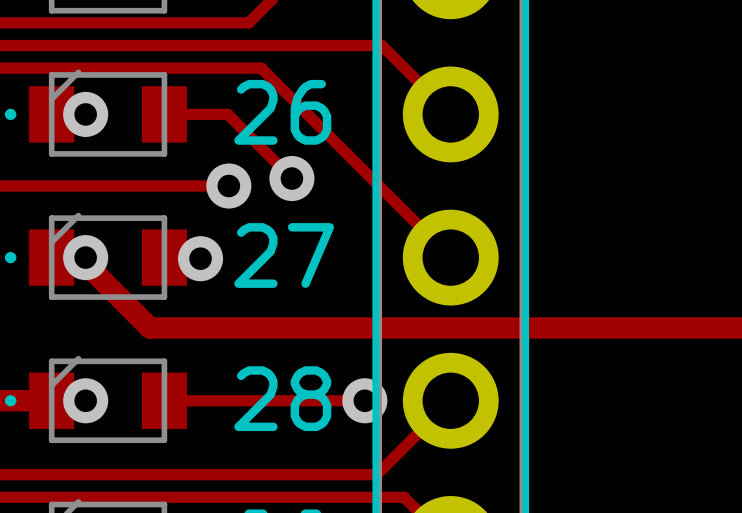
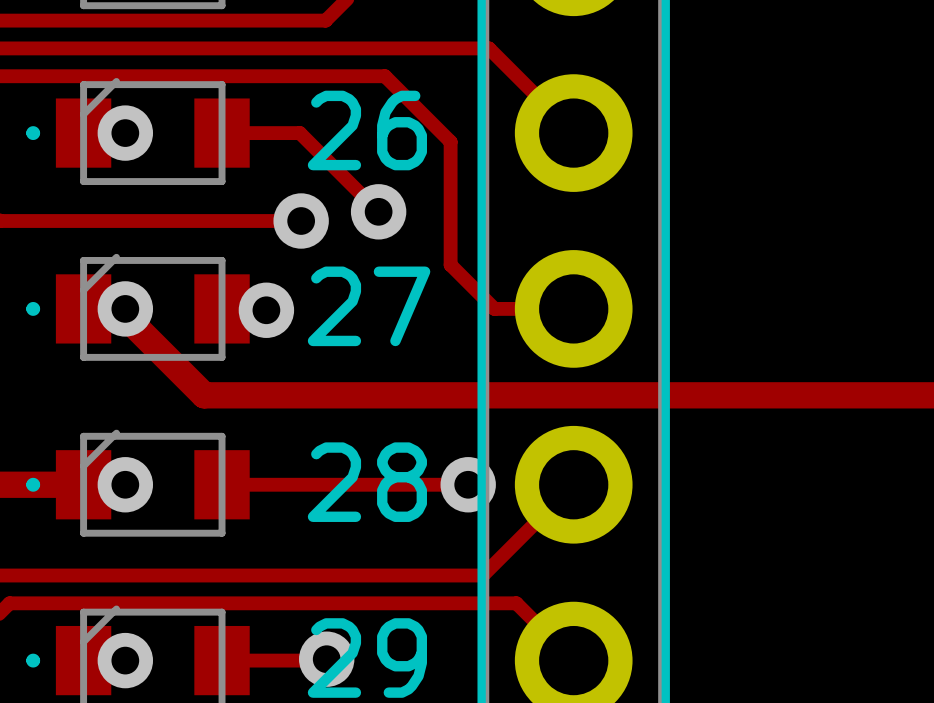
track: (261, 68) (450, 257) -> (341, 76) (384, 76) (450, 141) (450, 264) (494, 308) (573, 308)

